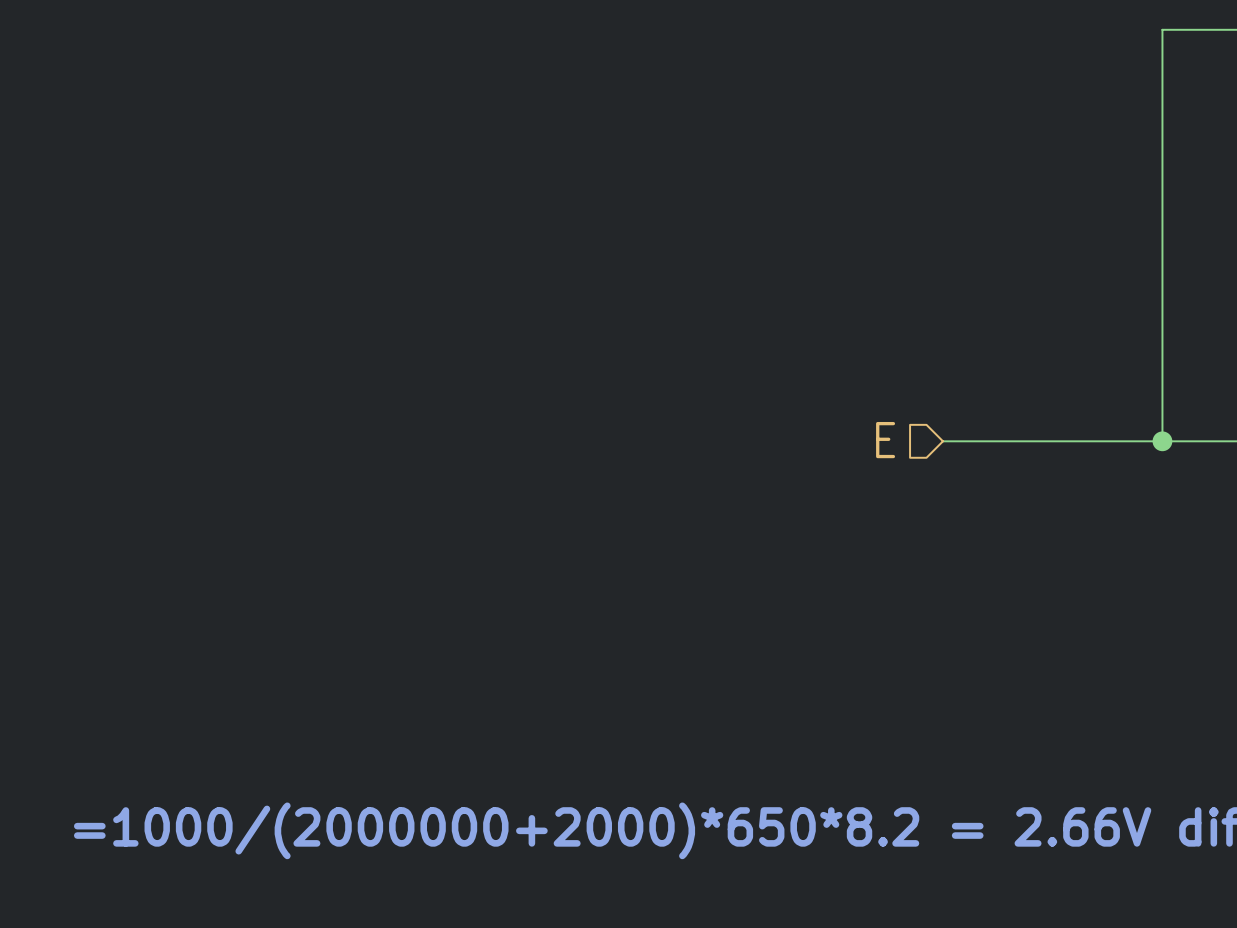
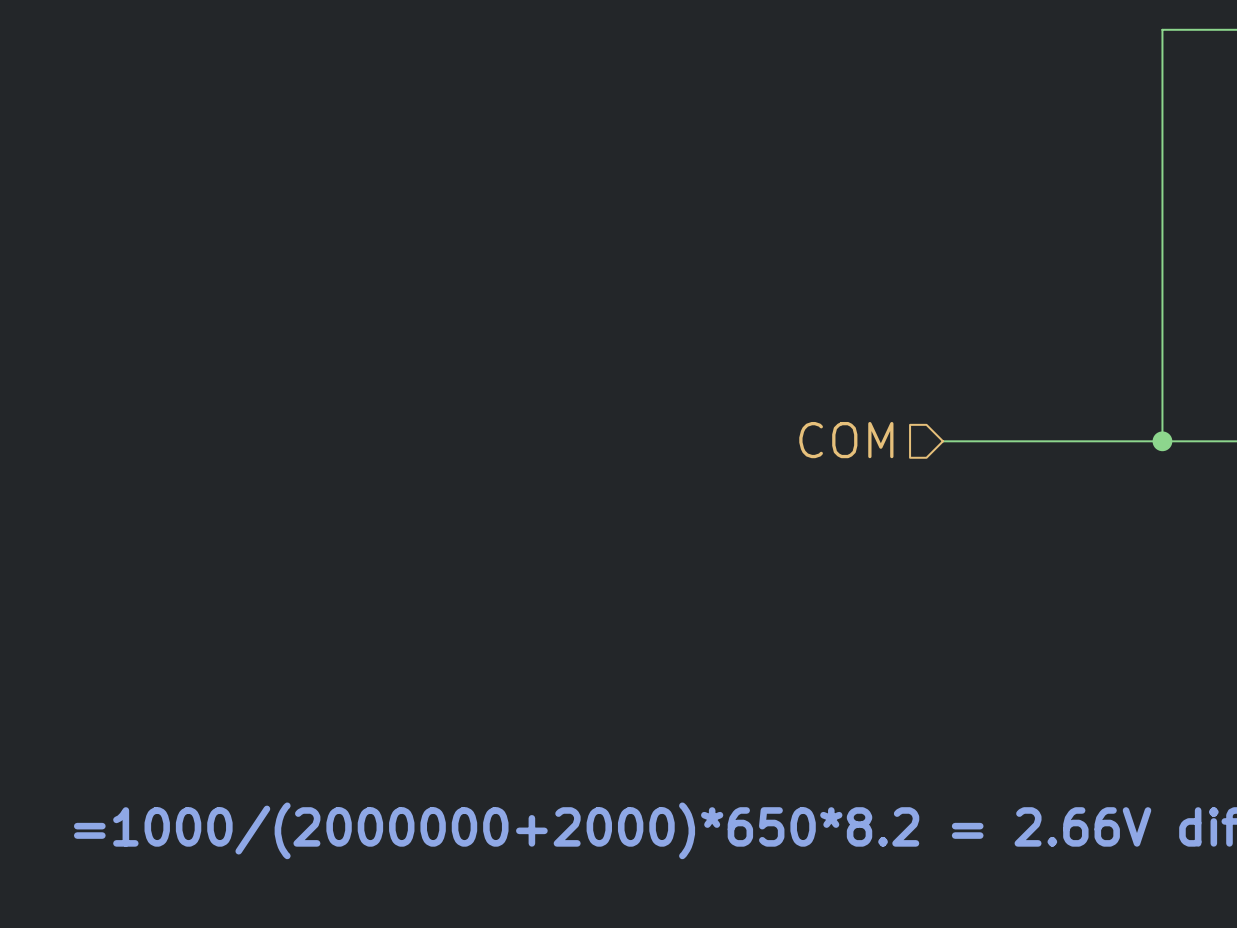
hierarchical label: E (885, 440) -> COM (846, 440)

